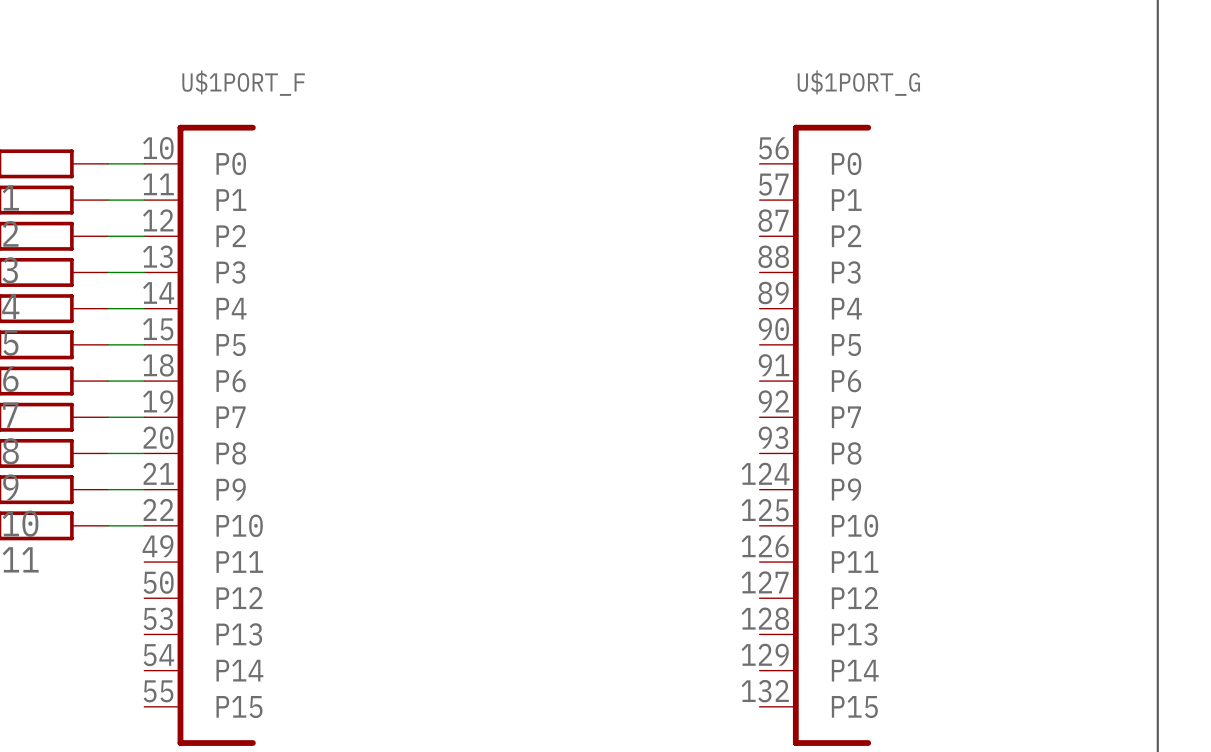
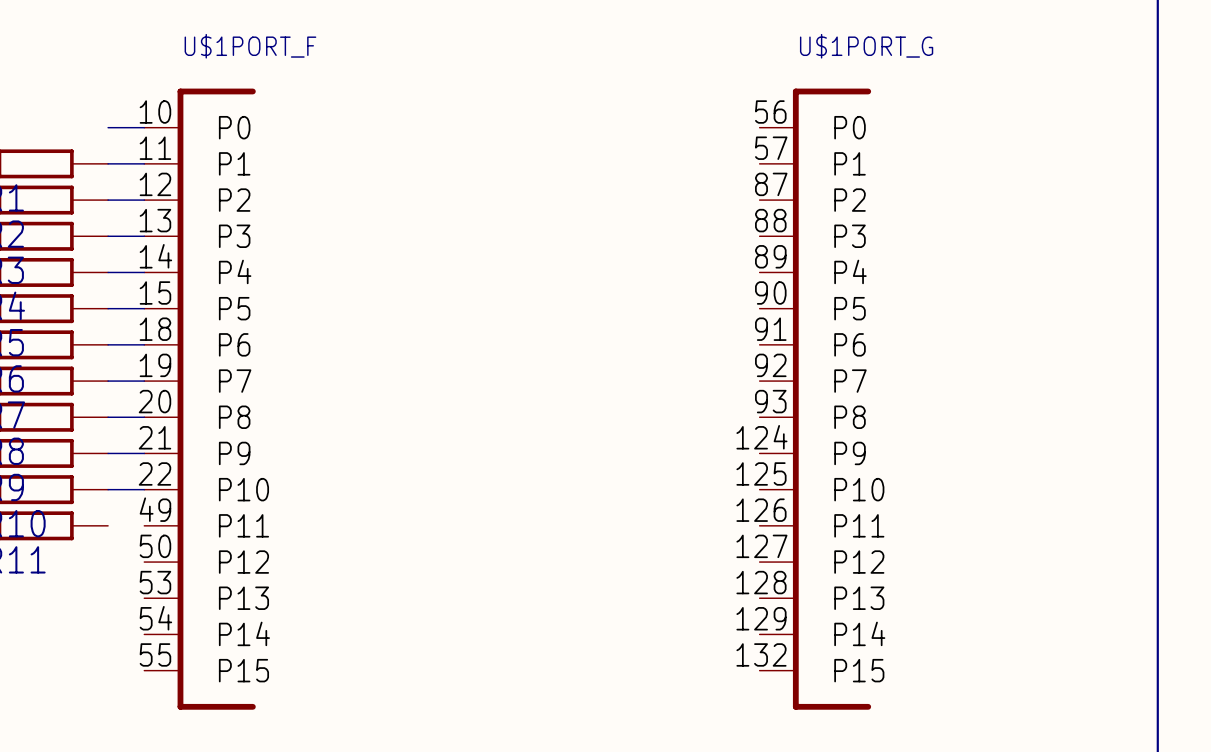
wire: none -> (108, 127) (144, 127)
U$1PORT_F position: (200, 435) -> (200, 399)
U$1PORT_G position: (815, 435) -> (815, 399)
wire: (108, 525) (144, 525) -> none

